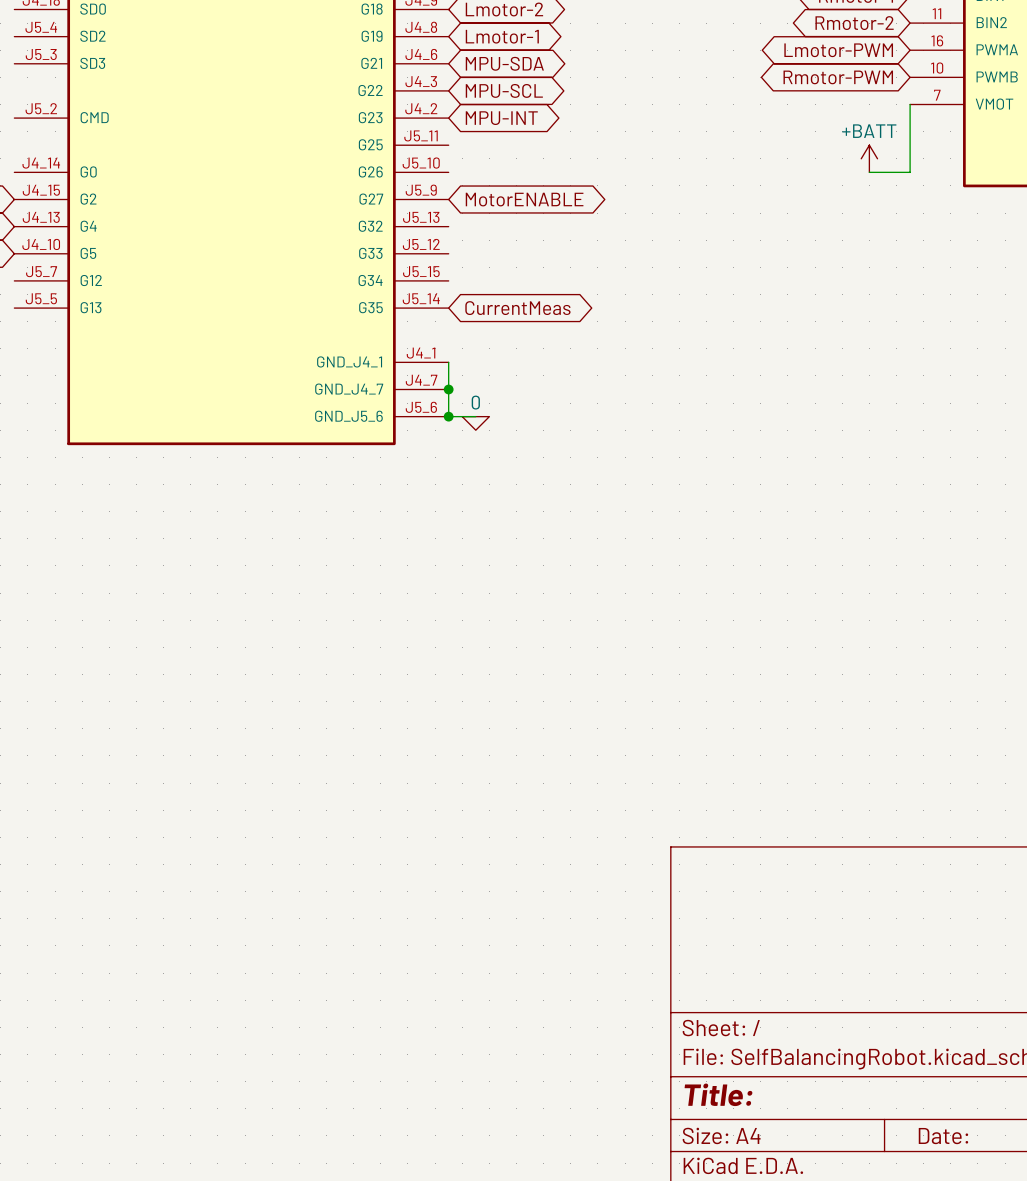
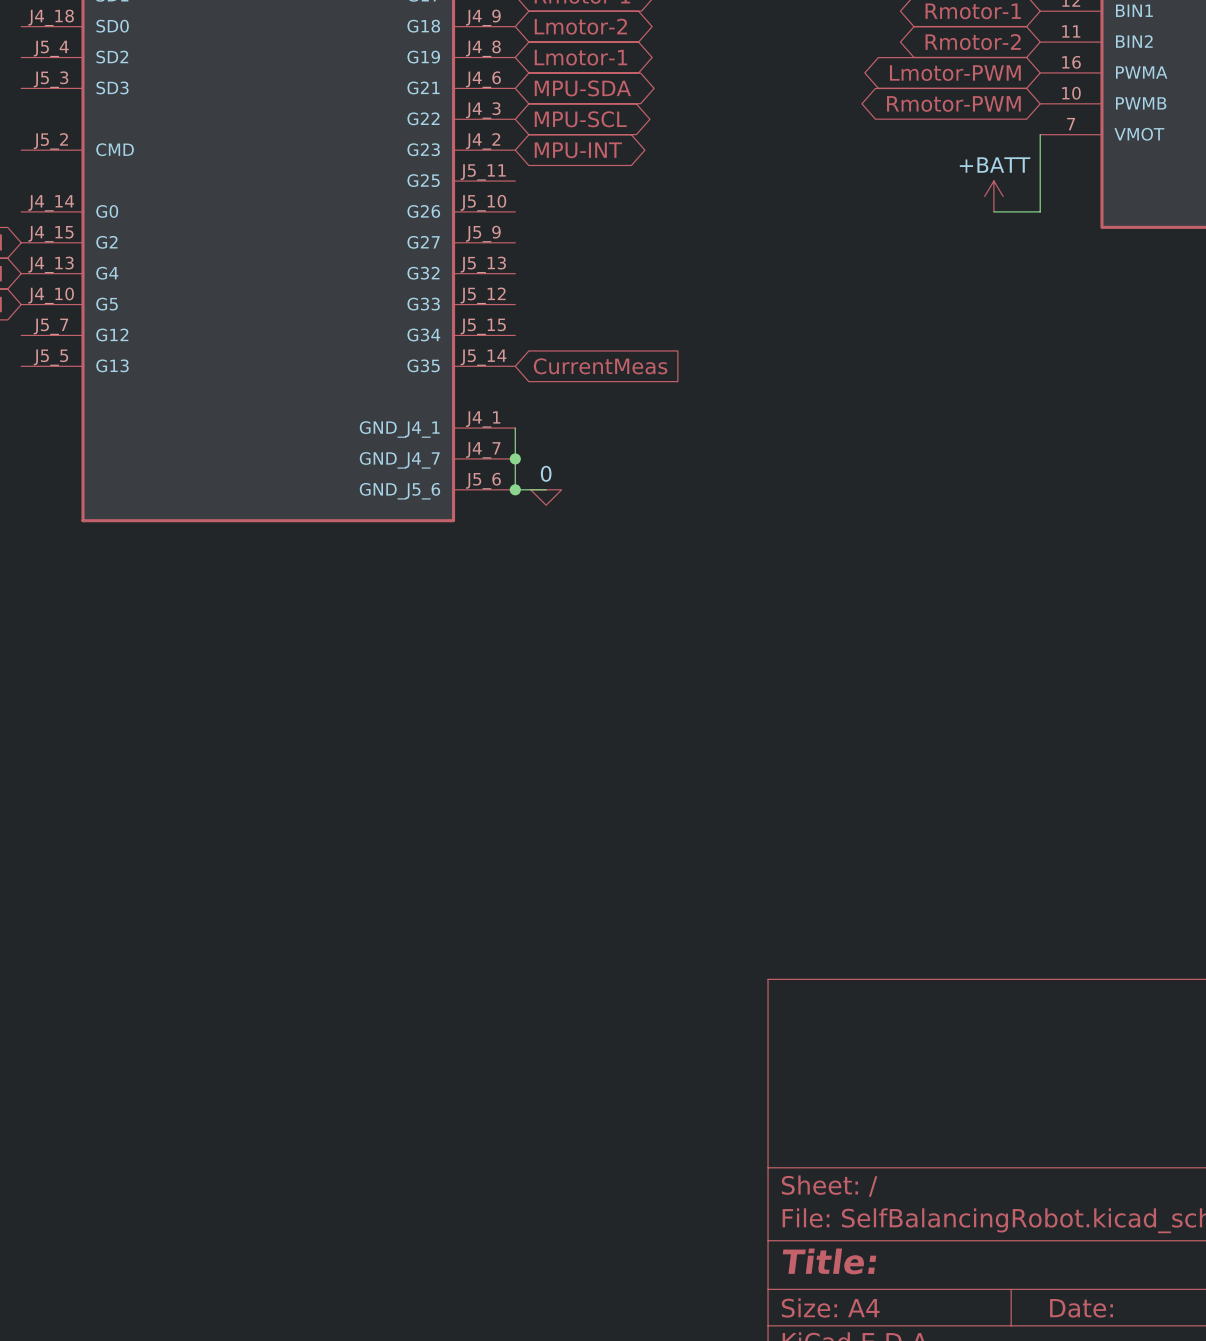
global label: MotorENABLE (524, 199) -> none
global label shape: bidirectional (517, 308) -> input (600, 366)

